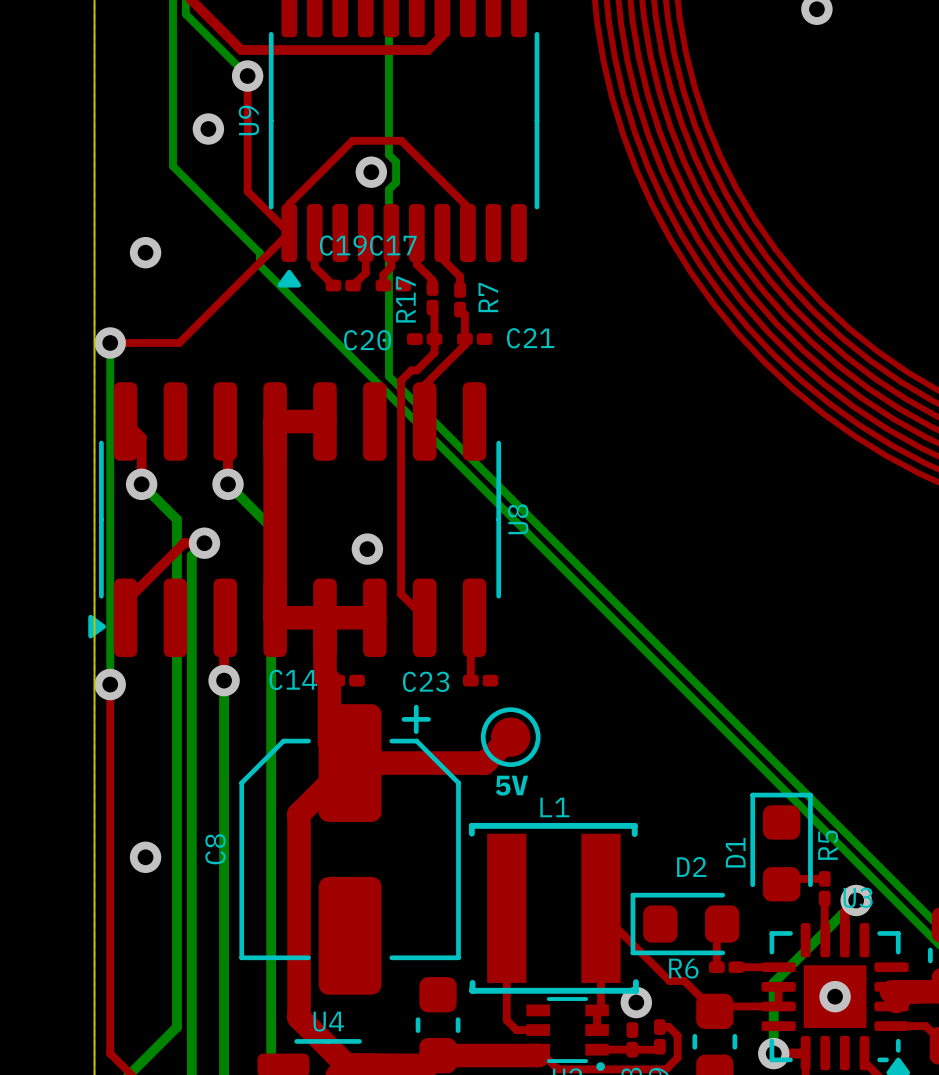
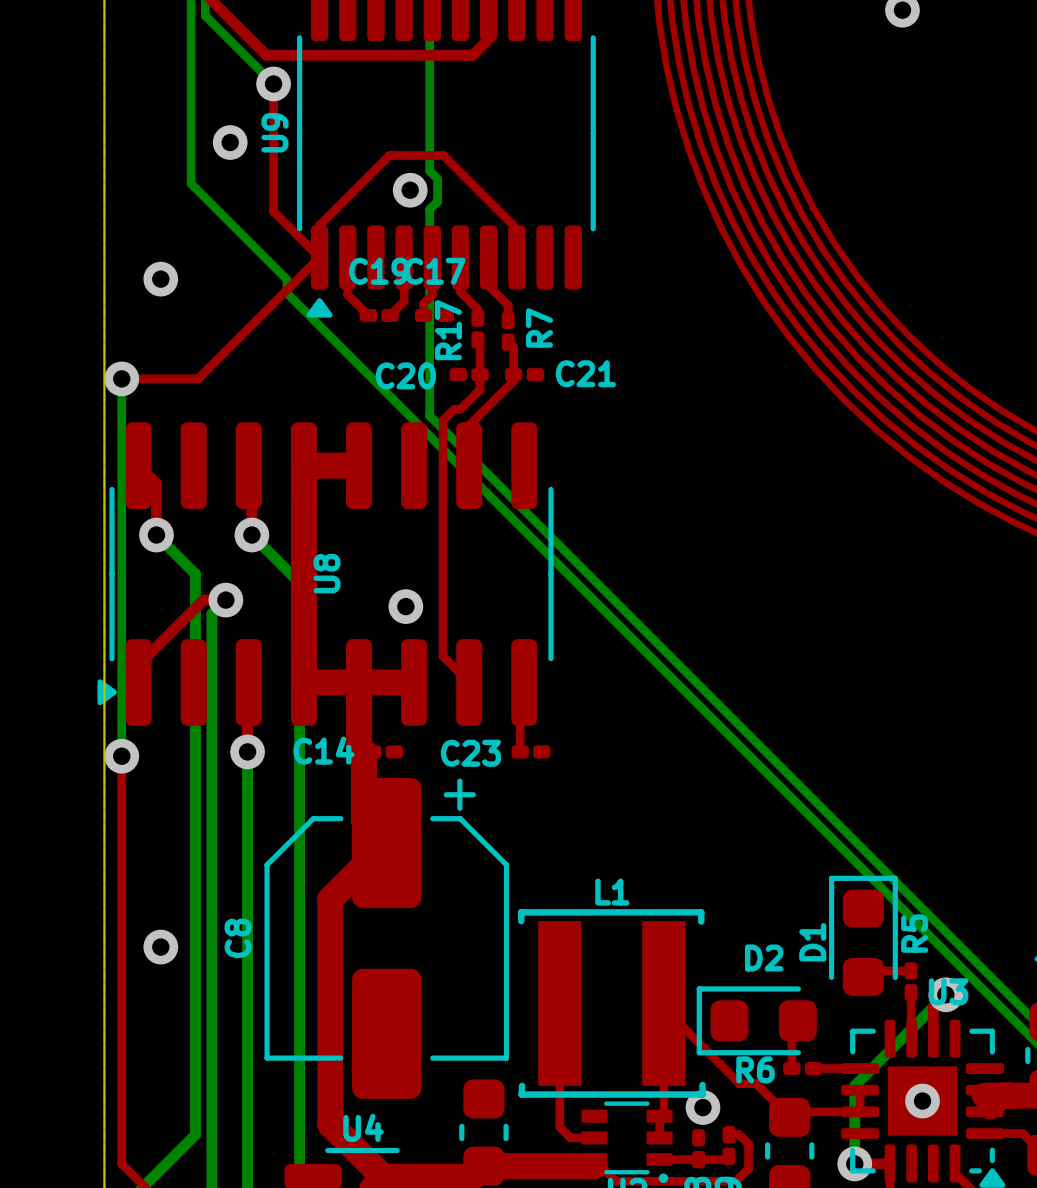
U8 name position: U8 (518, 519) -> U8 (326, 573)
top track: (510, 737) (484, 763) (350, 763) -> none
5V: (510, 737) -> none

